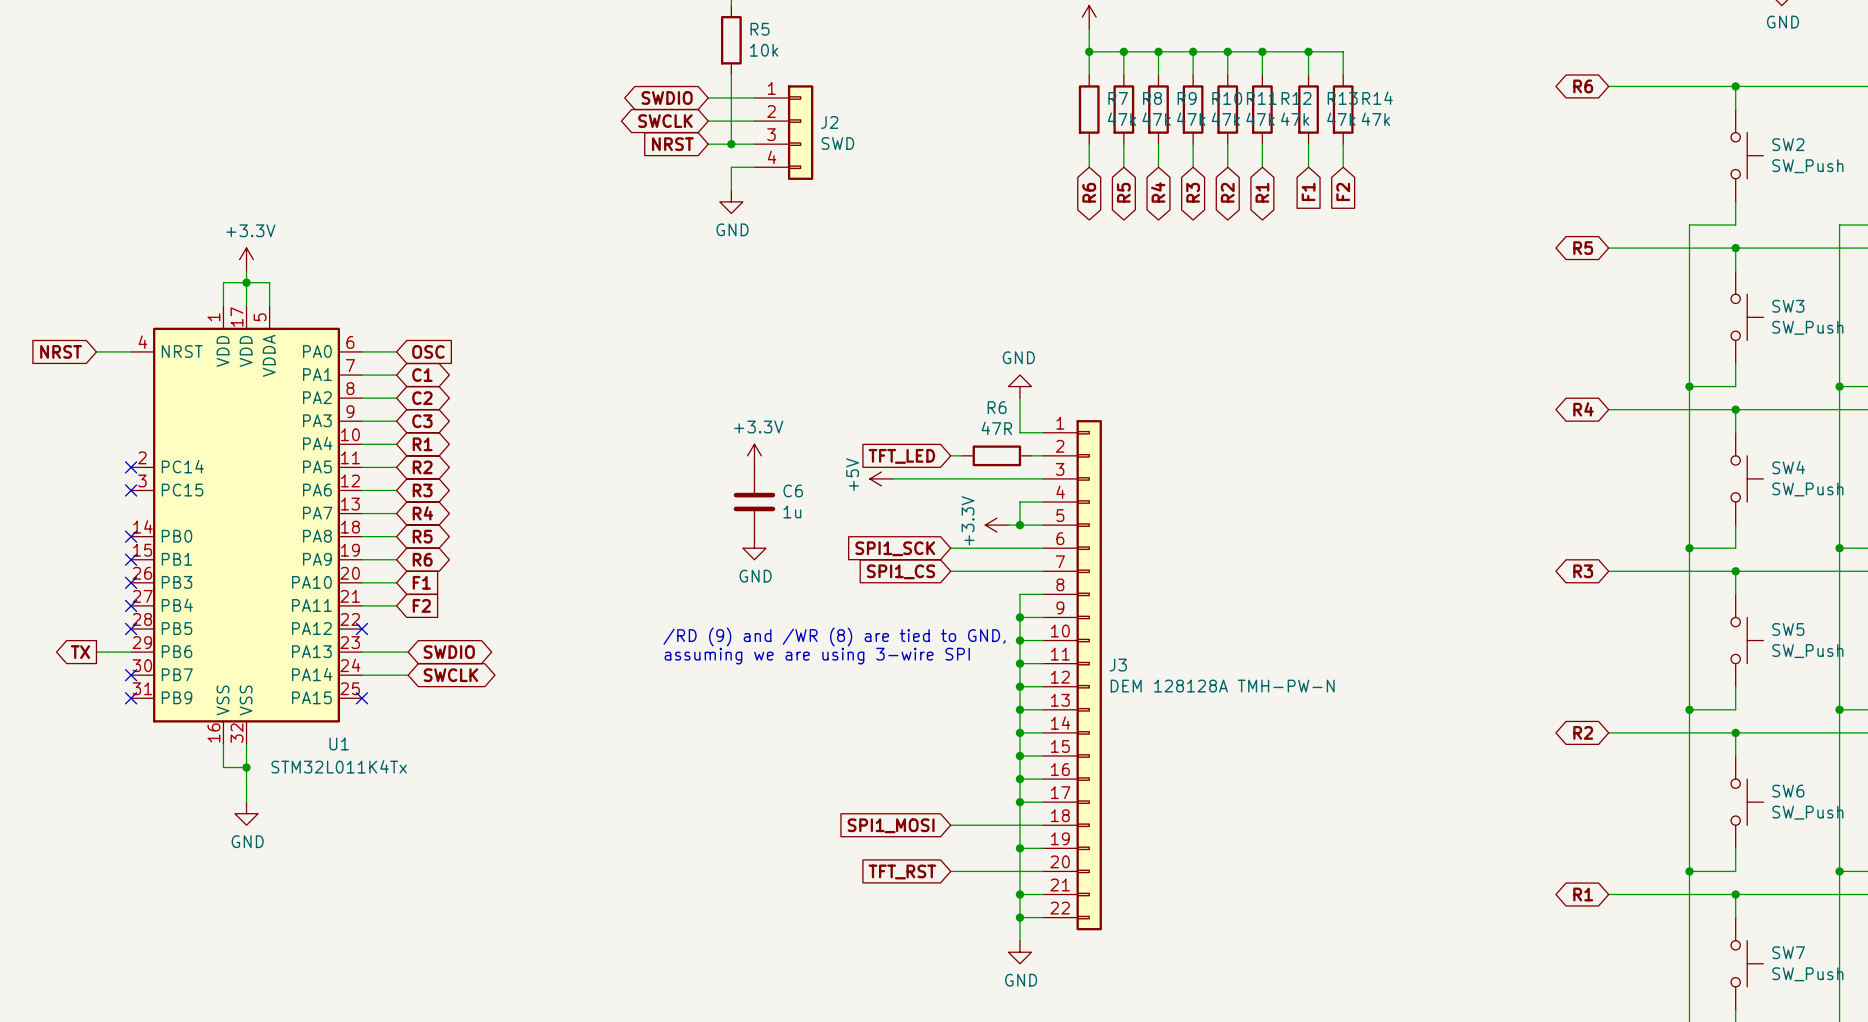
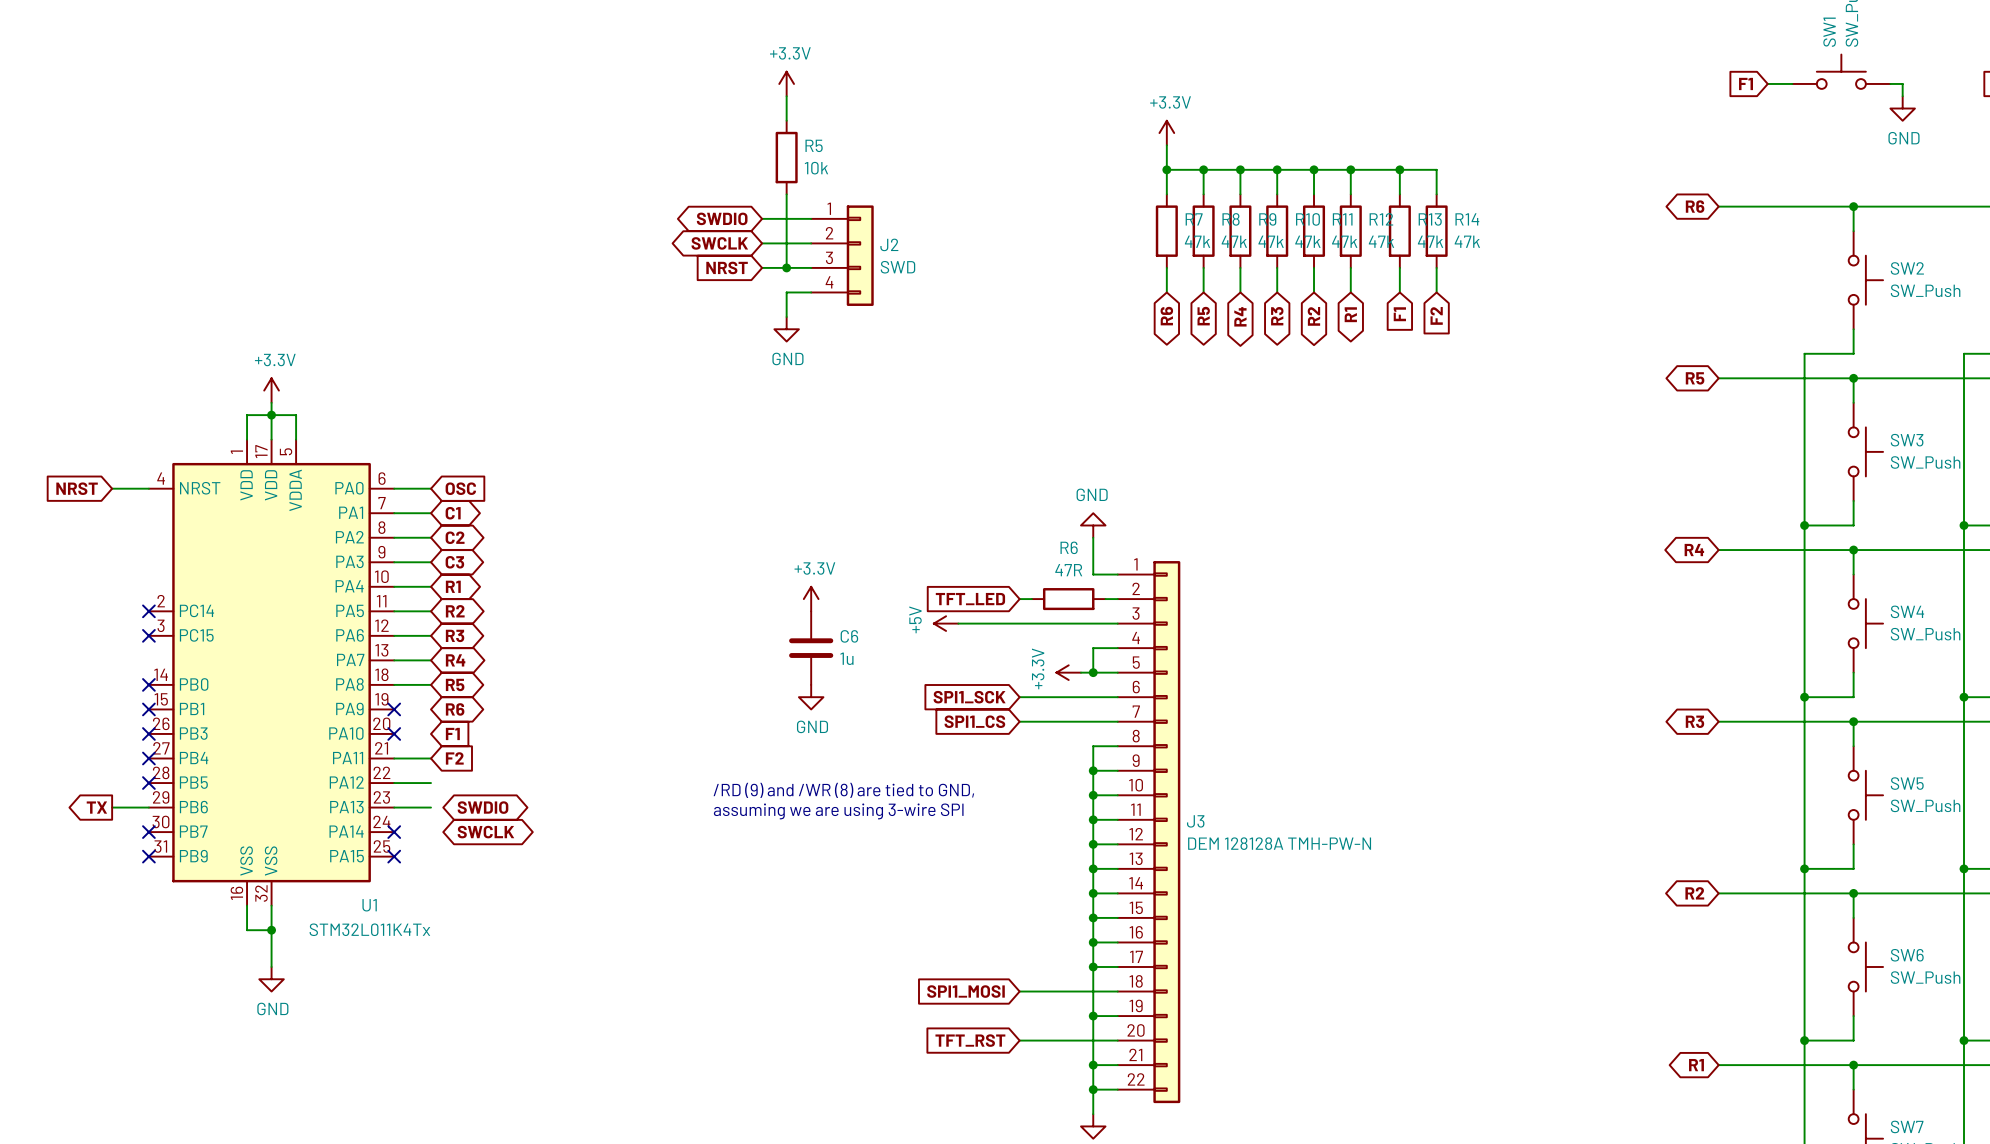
wire: (361, 559) (396, 559) -> none
no-connect mark: none -> (394, 709)
wire: (361, 582) (396, 582) -> (394, 783) (430, 783)
no-connect mark: none -> (394, 733)
no-connect mark: (361, 629) -> none
wire: (396, 652) (408, 652) -> none
wire: (361, 675) (408, 675) -> none
no-connect mark: none -> (394, 832)

